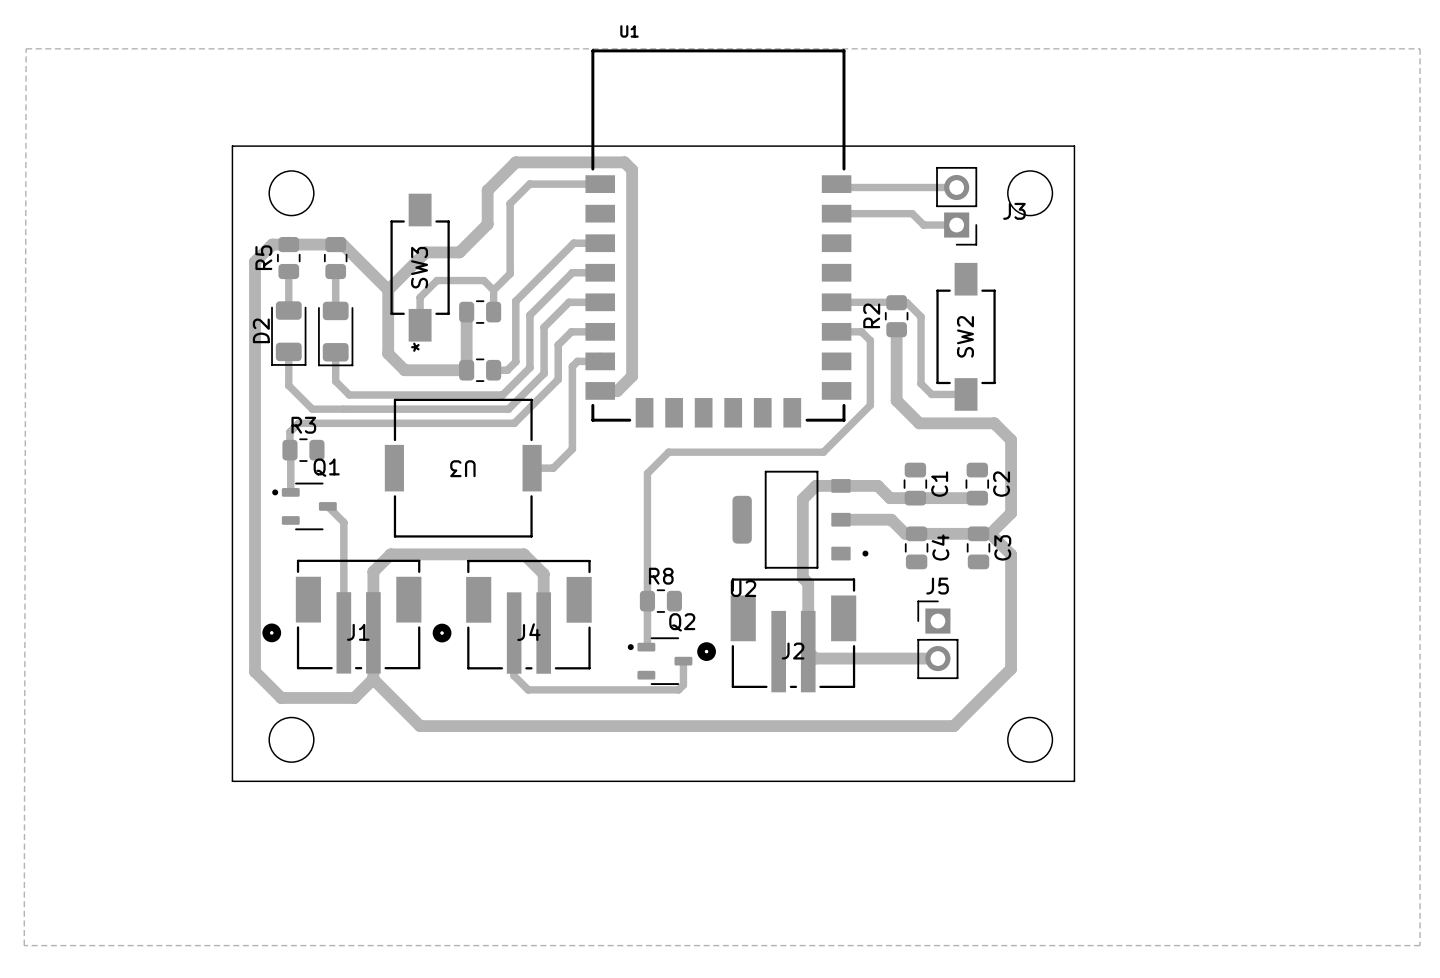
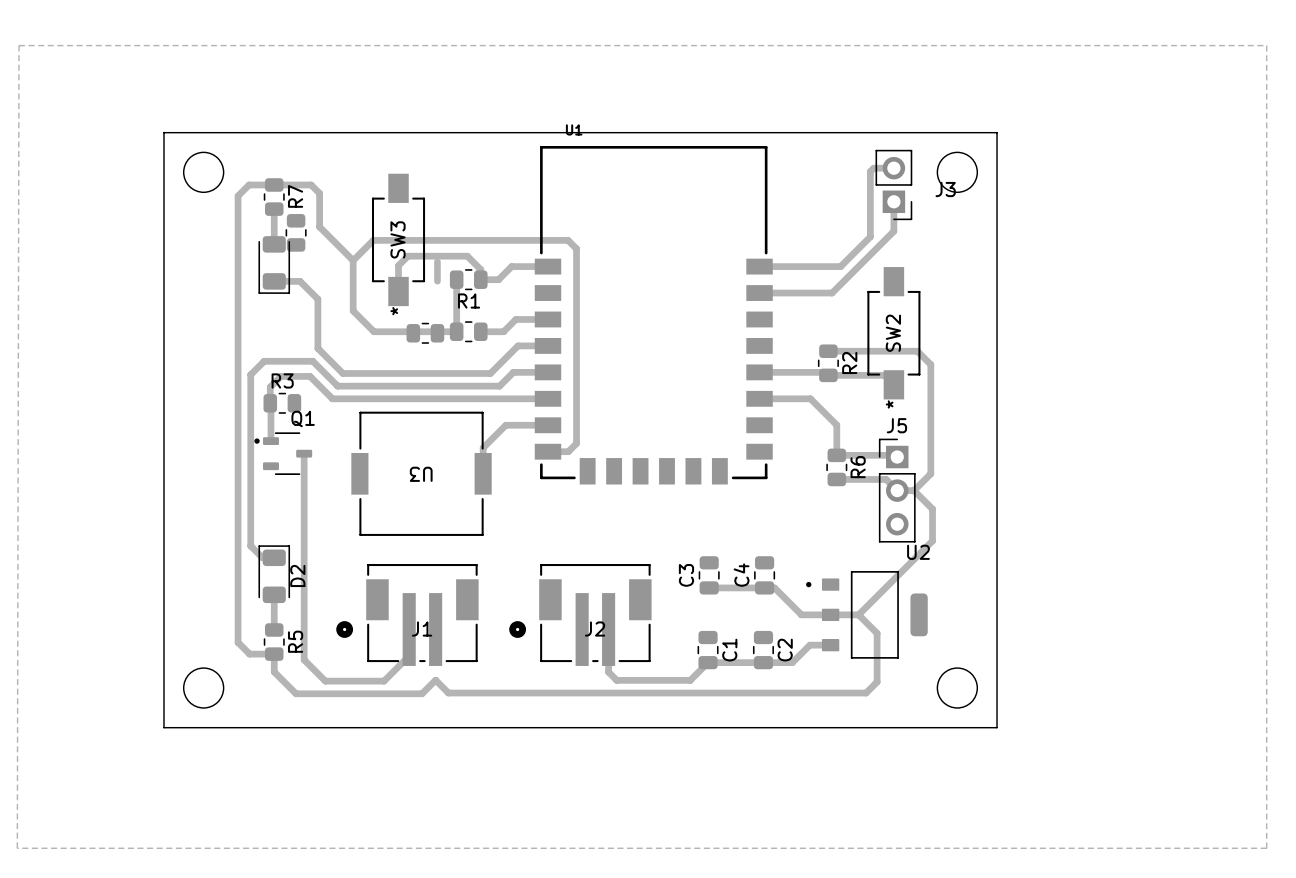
board edge: (232, 146) (232, 781) (1074, 781) (1074, 146) -> (203, 132) (163, 132) (163, 727) (997, 727) (997, 132) (957, 132)
track: (600, 184) (529, 184) (510, 203) (510, 273) (493, 290) (483, 280) (436, 280) (420, 297) (420, 325) -> none
track: (836, 184) (839, 187) (956, 187) -> none
track: none -> (893, 168) (873, 168) (870, 171) (870, 236) (840, 266) (759, 266)
round board edge position: (291, 193) -> (203, 172)
round board edge position: (1030, 193) -> (957, 172)
J3 position: (956, 206) -> (893, 184)
track: (836, 213) (912, 213) (923, 225) (956, 225) -> none
R7: none -> (274, 197)
track: none -> (893, 201) (893, 231) (832, 293) (759, 293)
U1 position: (718, 238) -> (653, 315)
track: (600, 243) (573, 243) (515, 301) (515, 361) (507, 370) (493, 370) -> none
R5 name position: R5 (263, 257) -> R5 (295, 641)
R5 position: (288, 258) -> (274, 642)
SW3 position: (420, 267) -> (398, 239)
track: (288, 271) (288, 310) -> none
track: (335, 271) (335, 310) -> (274, 209) (274, 244)
track: (600, 272) (572, 272) (529, 315) (529, 367) (502, 394) (349, 394) (335, 381) (335, 352) -> none
track: none -> (353, 260) (353, 310) (374, 331) (456, 331) (456, 279)
track: none -> (353, 260) (319, 226) (319, 193) (311, 184) (249, 184) (238, 195) (238, 642) (249, 654) (274, 654) (274, 671) (296, 693) (422, 693) (435, 680) (448, 693) (866, 693) (877, 682) (877, 633) (858, 614)
track: none -> (353, 260) (373, 240) (568, 240) (576, 248) (576, 443) (568, 451) (547, 451)
track: (388, 289) (388, 353) (404, 370) (466, 370) (466, 312) -> none
track: (388, 289) (425, 252) (459, 252) (487, 224) (487, 190) (515, 162) (624, 162) (632, 169) (632, 376) (617, 390) (600, 390) -> none
track: (388, 289) (342, 244) (272, 244) (255, 261) (255, 671) (281, 697) (354, 697) (373, 679) -> none
track: none -> (547, 266) (511, 266) (498, 279) (480, 279) (480, 269) (467, 256) (407, 256) (398, 265) (398, 291)
track: (600, 302) (569, 302) (544, 327) (544, 373) (508, 409) (312, 409) (288, 385) (288, 351) -> none
track: (836, 302) (906, 302) (921, 316) (921, 383) (931, 394) (966, 394) -> none
R1: none -> (468, 279)
track: none -> (274, 281) (300, 281) (317, 299) (317, 348) (342, 373) (490, 373) (518, 345) (547, 345)
part position: (480, 312) -> (468, 331)
R2 name position: R2 (871, 315) -> R2 (849, 362)
R2 position: (896, 316) -> (828, 363)
track: (896, 329) (896, 400) (919, 423) (994, 423) (1011, 440) (1011, 513) (990, 533) -> none
track: (600, 331) (571, 331) (558, 345) (558, 379) (514, 423) (298, 423) (289, 432) (290, 492) -> none
track: (836, 331) (861, 331) (870, 340) (870, 405) (823, 452) (668, 452) (647, 473) (646, 647) -> none
D2 rotation: 0° (288, 333) -> 180° (274, 574)
D2 position: (288, 333) -> (274, 574)
part position: (335, 333) -> (274, 265)
SW2 position: (966, 336) -> (893, 333)
track: none -> (547, 319) (515, 319) (503, 331) (480, 331)
track: (600, 361) (577, 361) (572, 366) (572, 449) (553, 468) (532, 468) -> none
track: none -> (828, 351) (917, 351) (930, 364) (930, 473) (914, 490)
track: none -> (547, 372) (513, 372) (499, 386) (337, 386) (312, 361) (264, 361) (250, 374) (250, 546) (262, 557) (274, 557)
track: none -> (759, 372) (825, 372) (828, 375) (884, 375) (893, 384)
track: none -> (547, 398) (332, 398) (310, 376) (280, 376) (270, 387) (270, 441)
track: none -> (759, 398) (810, 398) (836, 425) (836, 455) (895, 455) (897, 457)
SW2 text: none -> * (889, 404)
R3 position: (303, 450) -> (282, 403)
U3 position: (463, 468) -> (421, 473)
track: none -> (547, 425) (505, 425) (483, 447) (483, 473)
C1 position: (915, 484) -> (708, 650)
C2 position: (977, 484) -> (763, 650)
track: (977, 498) (890, 498) (877, 485) (816, 485) (802, 499) (802, 577) (808, 583) (808, 651) (815, 658) (937, 658) -> none
track: none -> (304, 453) (304, 659) (325, 681) (384, 681) (409, 656) (409, 629)
Q1 position: (304, 506) -> (283, 453)
track: (327, 506) (343, 522) (343, 655) -> none
U2 rotation: 0° (800, 519) -> 180° (866, 614)
U2 position: (800, 519) -> (866, 614)
track: (840, 519) (891, 519) (905, 533) (990, 533) -> none
R6: none -> (836, 467)
track: none -> (836, 479) (886, 479) (897, 490) (914, 490)
track: (990, 533) (1011, 554) (1011, 668) (953, 726) (420, 726) (373, 679) (373, 571) (390, 554) (523, 554) (543, 574) (543, 633) -> none
track: none -> (914, 490) (932, 509) (932, 540) (858, 614)
C4 position: (916, 547) -> (764, 575)
C4 name position: C4 (940, 547) -> C4 (741, 575)
C3 position: (978, 547) -> (709, 575)
C3 name position: C3 (1002, 547) -> C3 (686, 575)
J5 footprint: [917, 600, 959, 680] -> [878, 438, 916, 543]
R8: (660, 601) -> none
J1 position: (341, 616) -> (407, 614)
J4: (512, 616) -> none
track: (514, 633) (514, 675) (528, 689) (678, 689) (683, 685) (683, 661) -> none
J2 position: (776, 635) -> (580, 614)
track: none -> (709, 587) (774, 587) (801, 614) (858, 614)
Q2: (660, 661) -> none
track: none -> (274, 594) (274, 629)
track: none -> (608, 629) (608, 672) (616, 680) (690, 680) (708, 662) (792, 662) (809, 645) (830, 645)
round board edge position: (291, 739) -> (203, 688)
round board edge position: (1030, 739) -> (957, 688)

